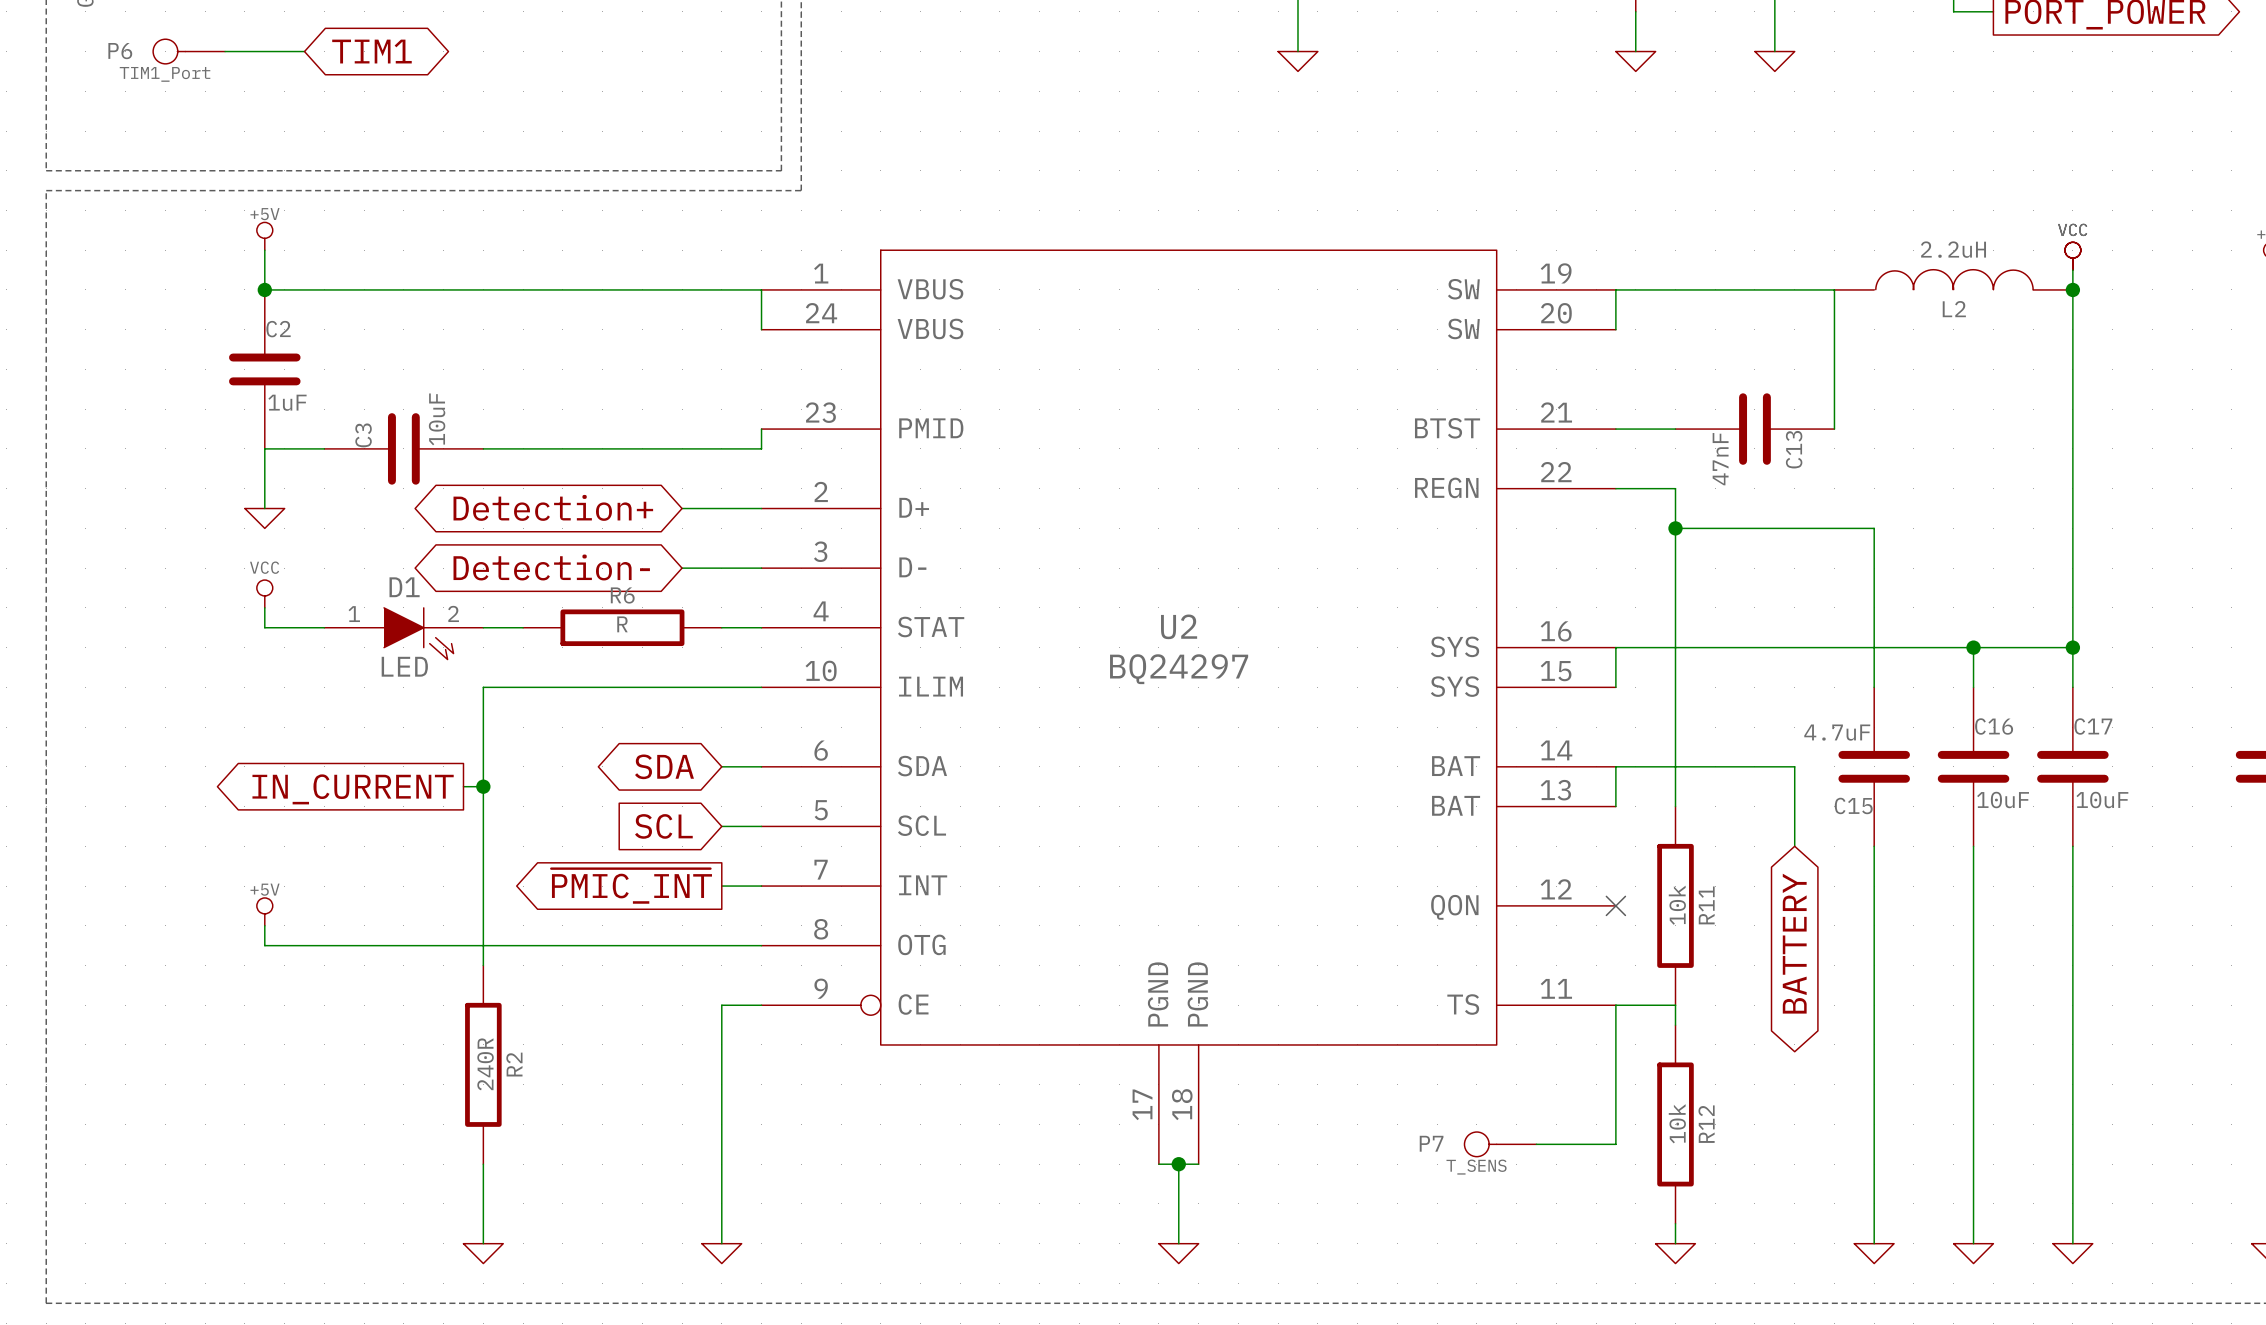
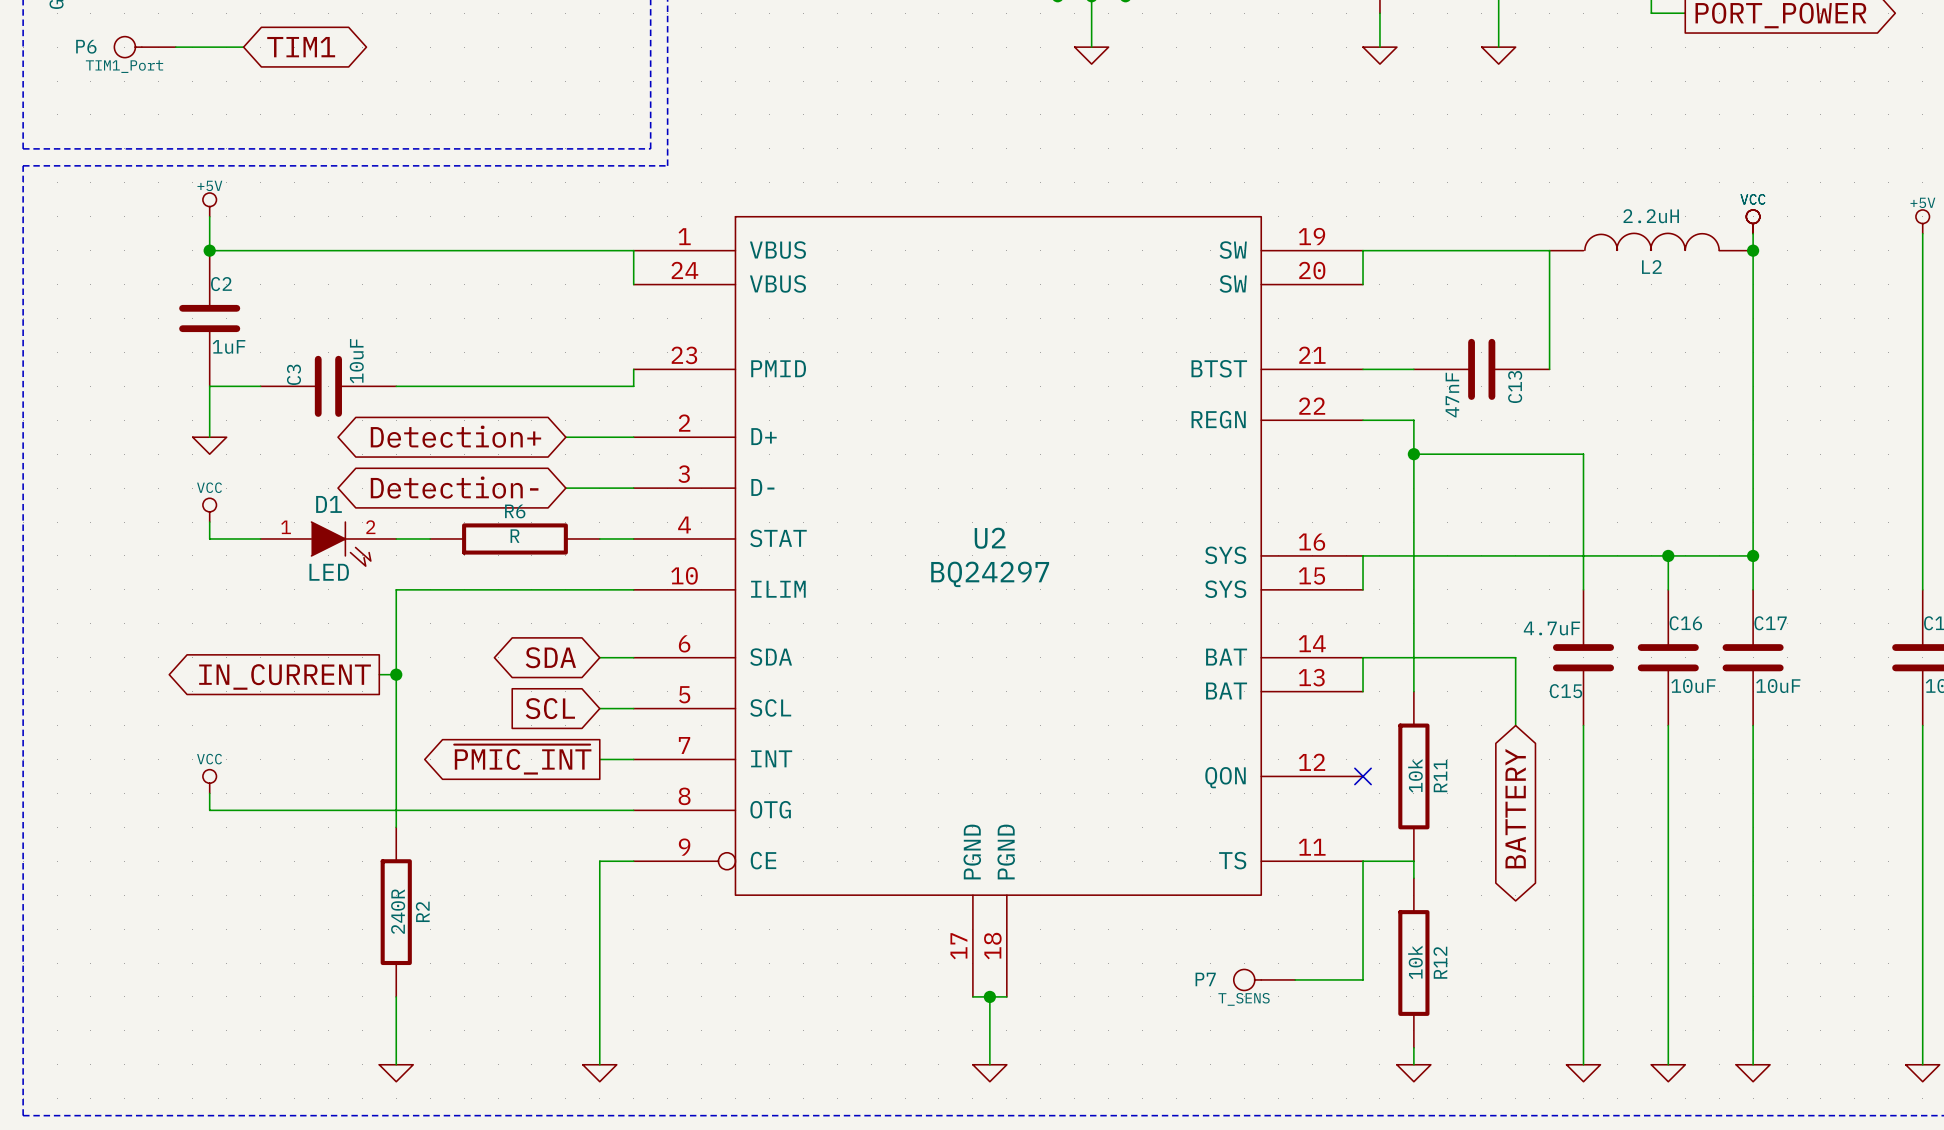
power symbol: +5V (264, 911) -> VCC (209, 781)

